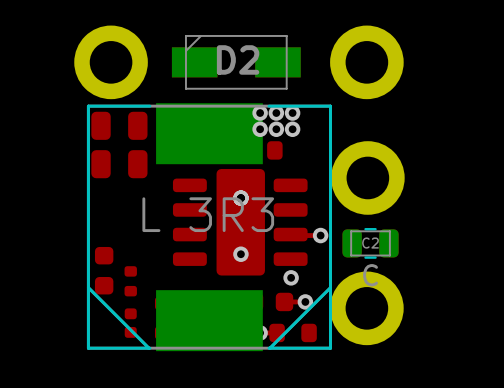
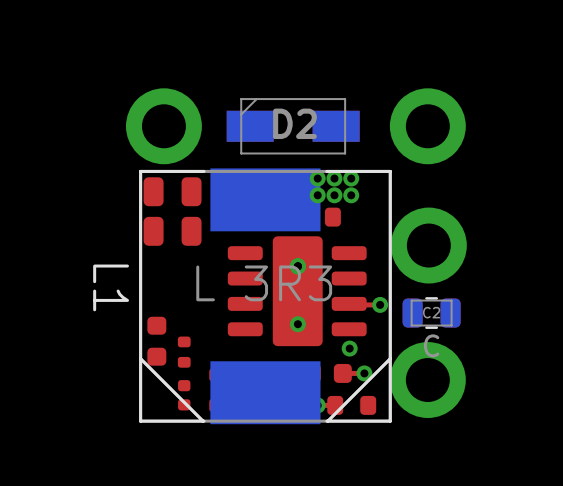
L1 name: none -> L1 (111, 287)

